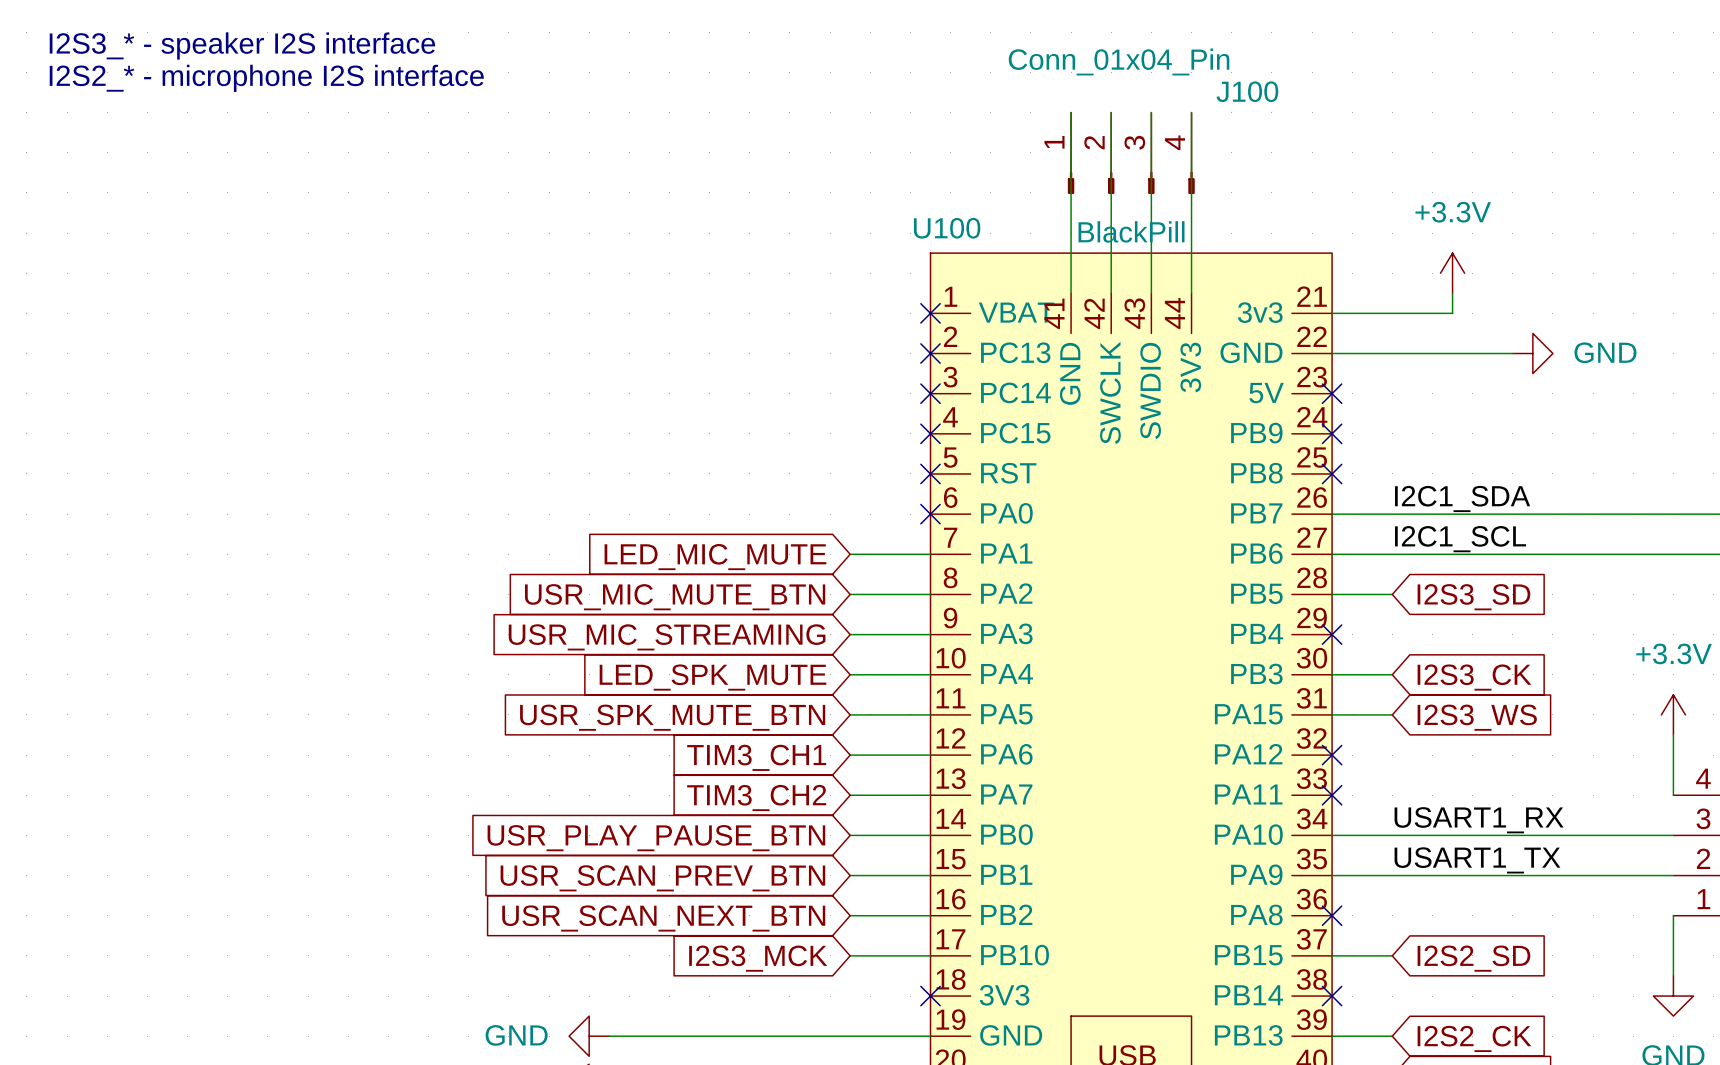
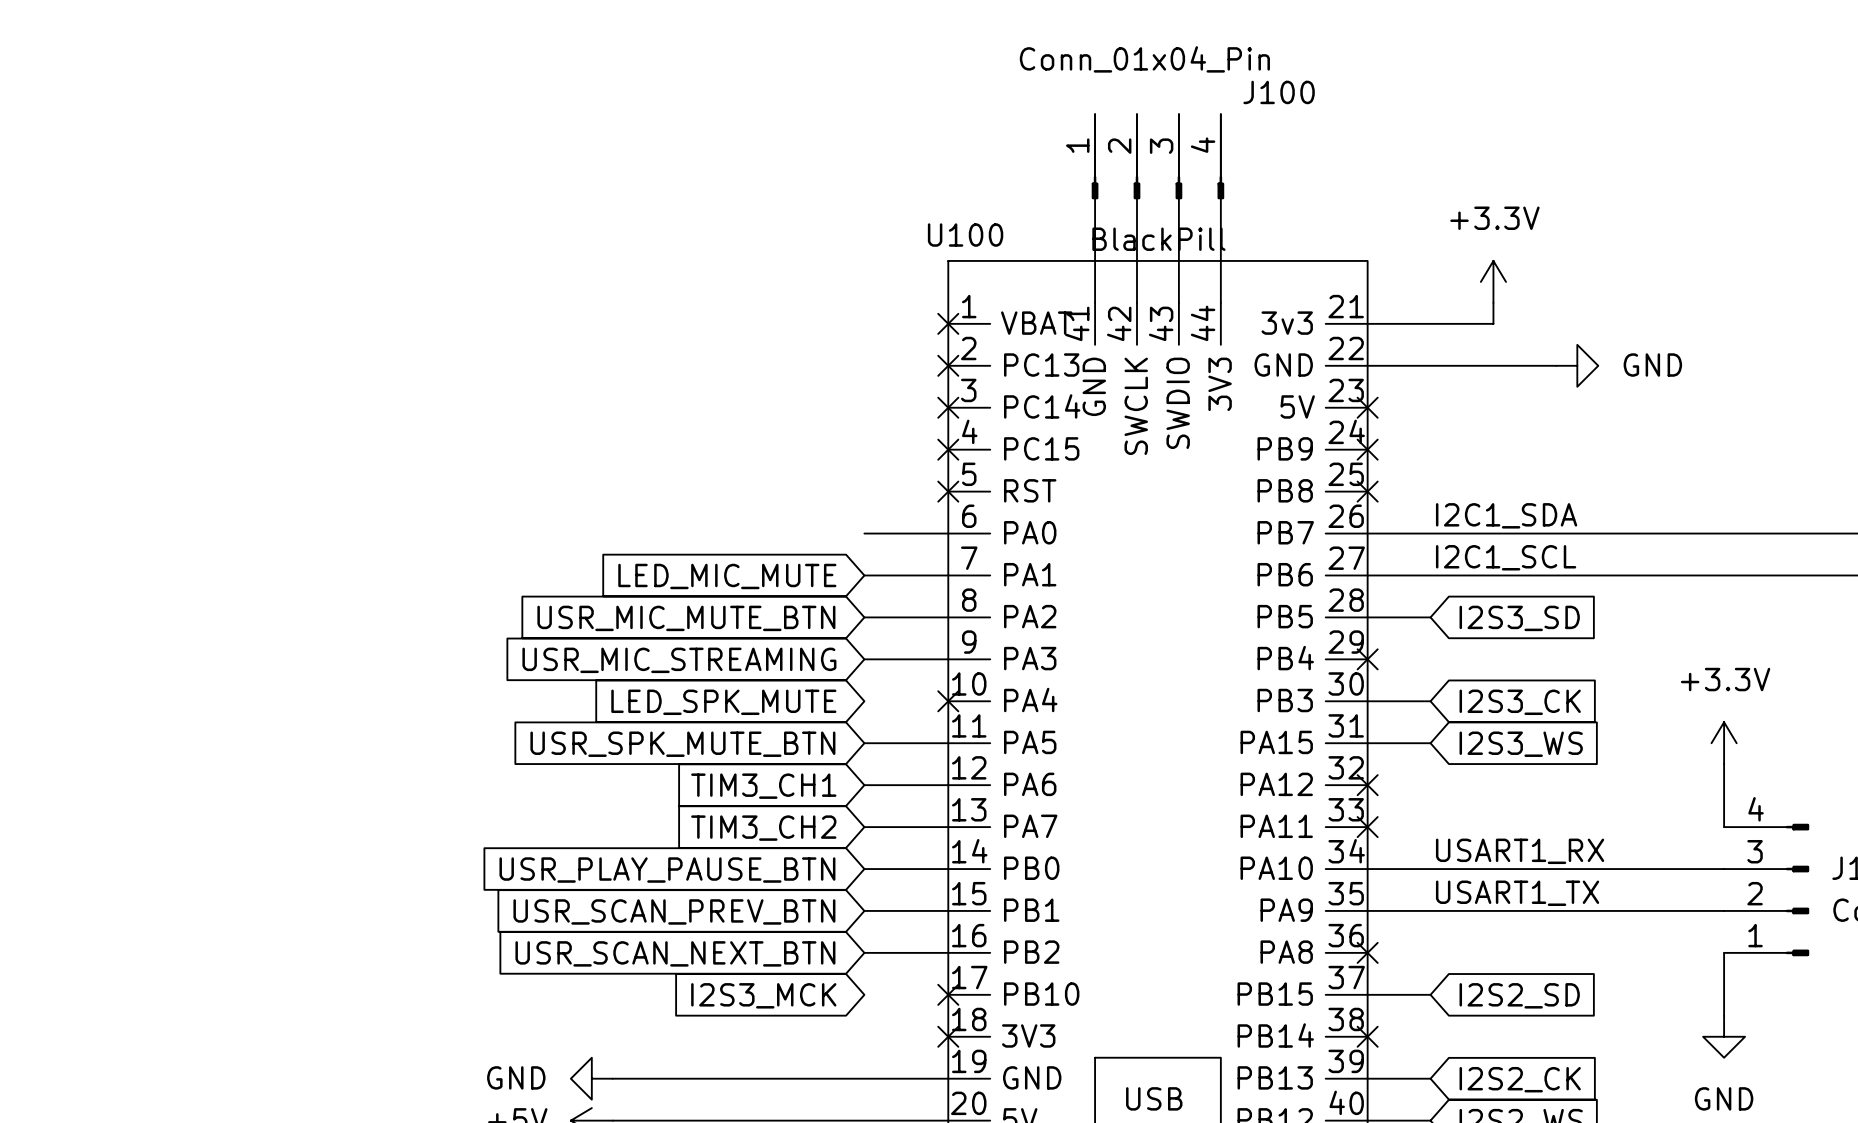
text: I2S3_* - speaker I2S interface (242, 46) -> none
text: I2S2_* - microphone I2S interface (266, 78) -> none
no-connect mark: (930, 514) -> none
wire: (850, 674) (930, 674) -> (864, 533) (948, 533)
no-connect mark: none -> (948, 701)
wire: (850, 955) (930, 955) -> none
no-connect mark: none -> (948, 994)

